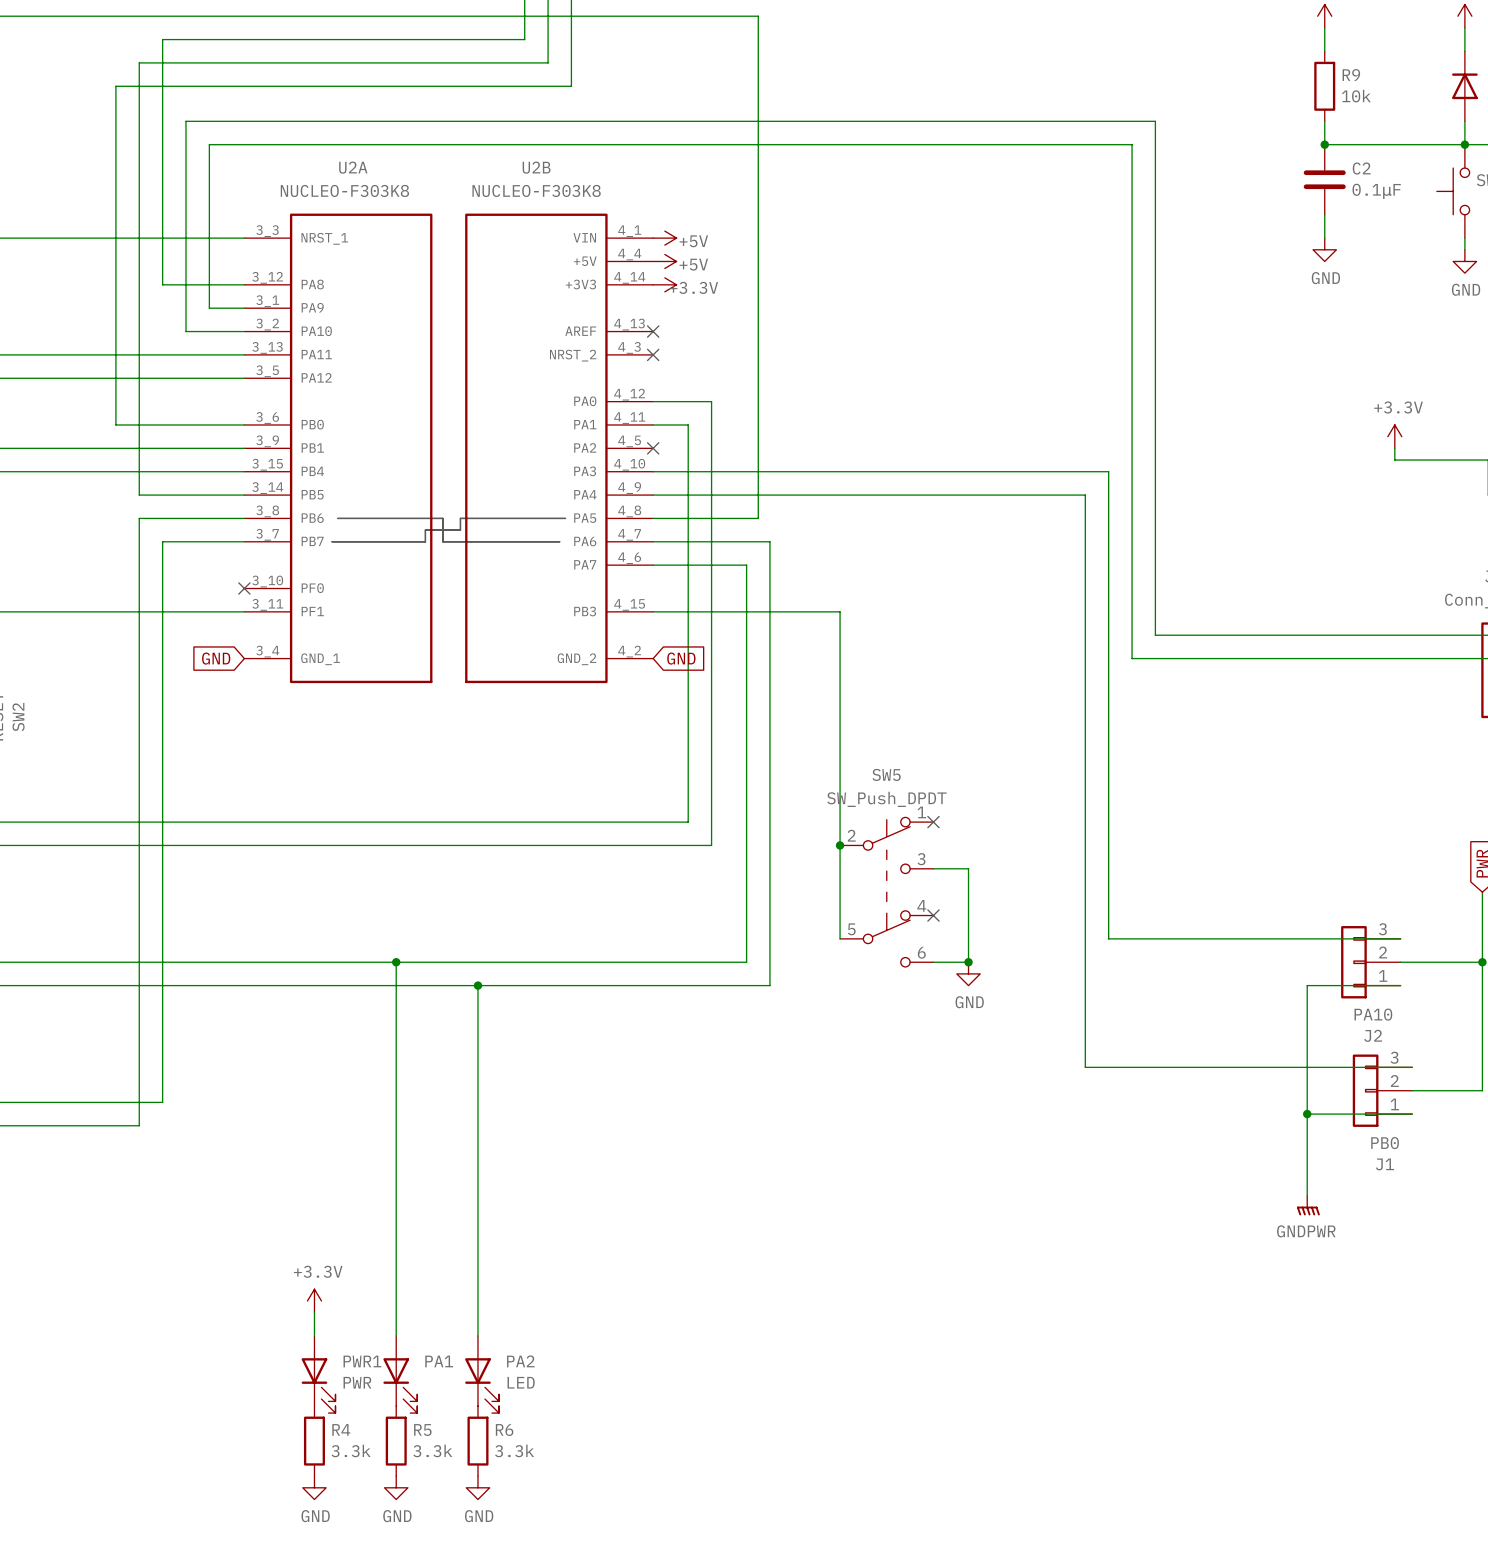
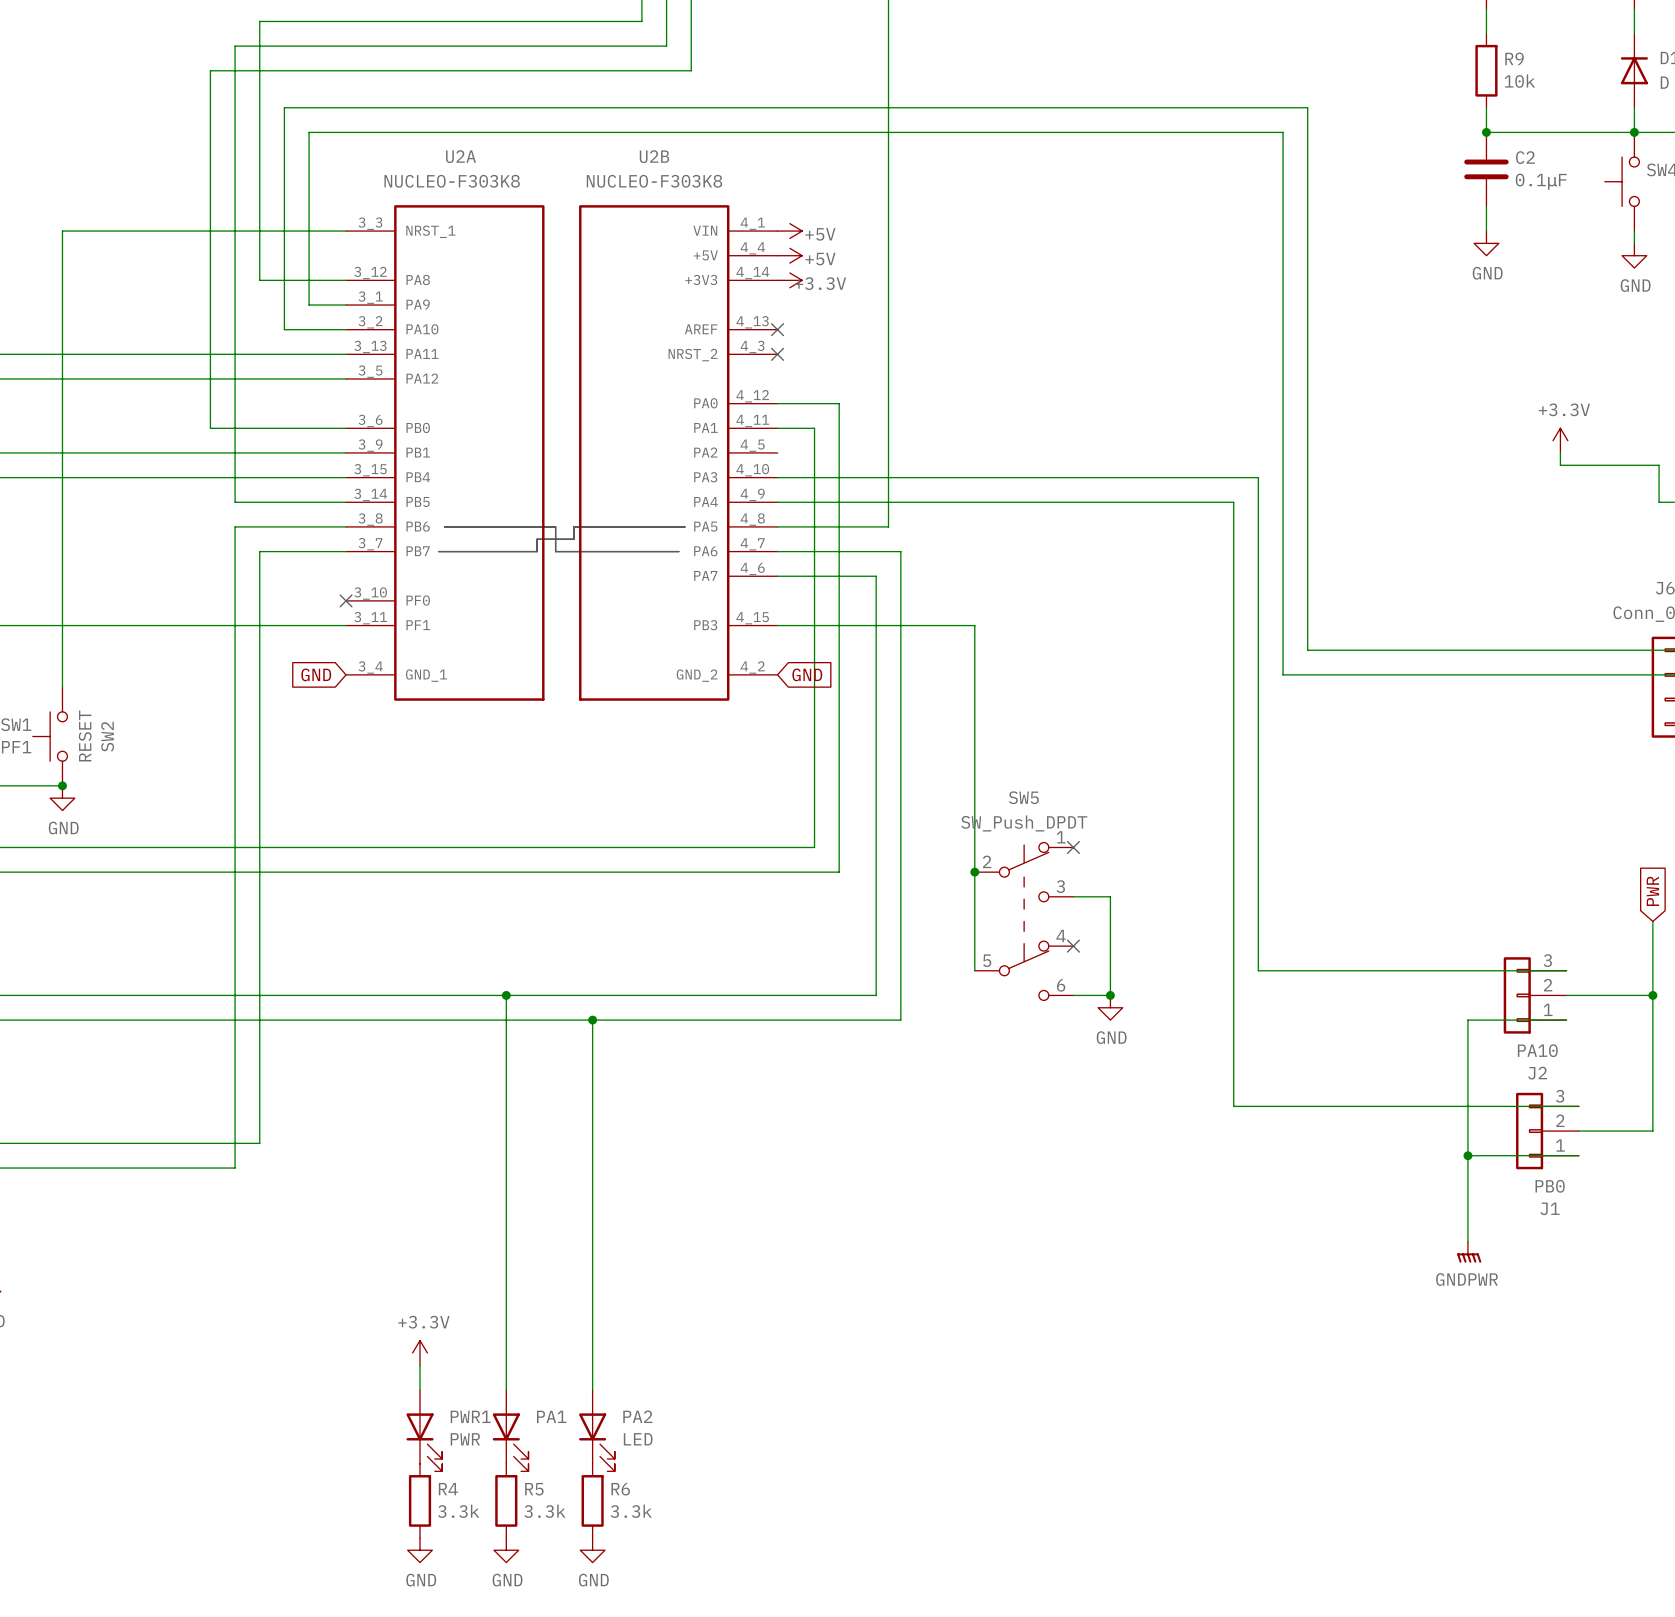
no-connect mark: (653, 448) -> none

